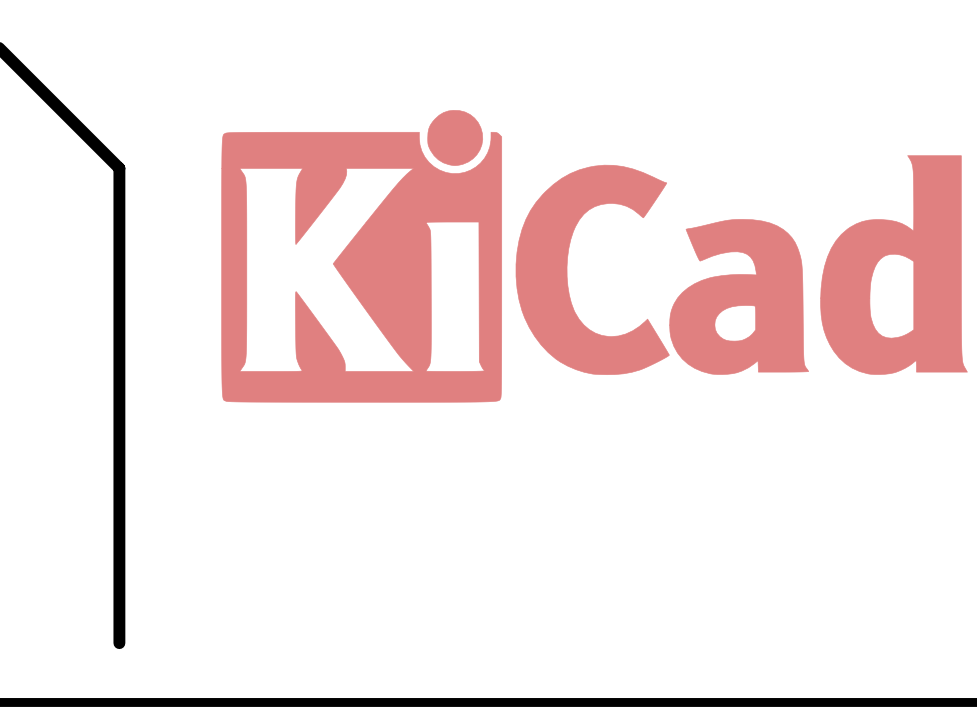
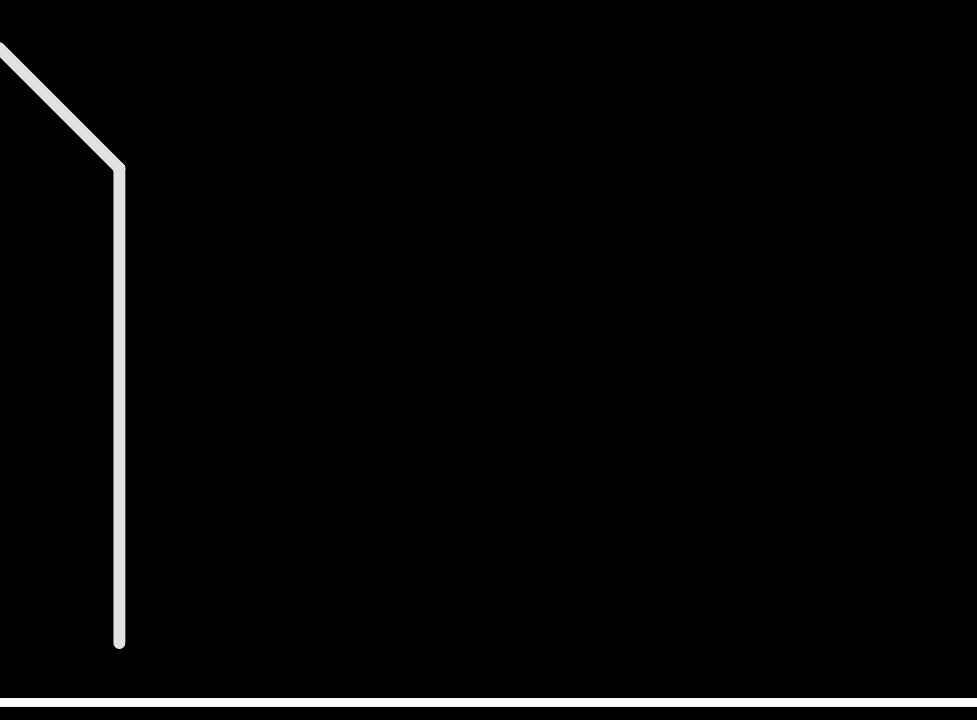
drawing: [221, 110, 968, 403] -> none

